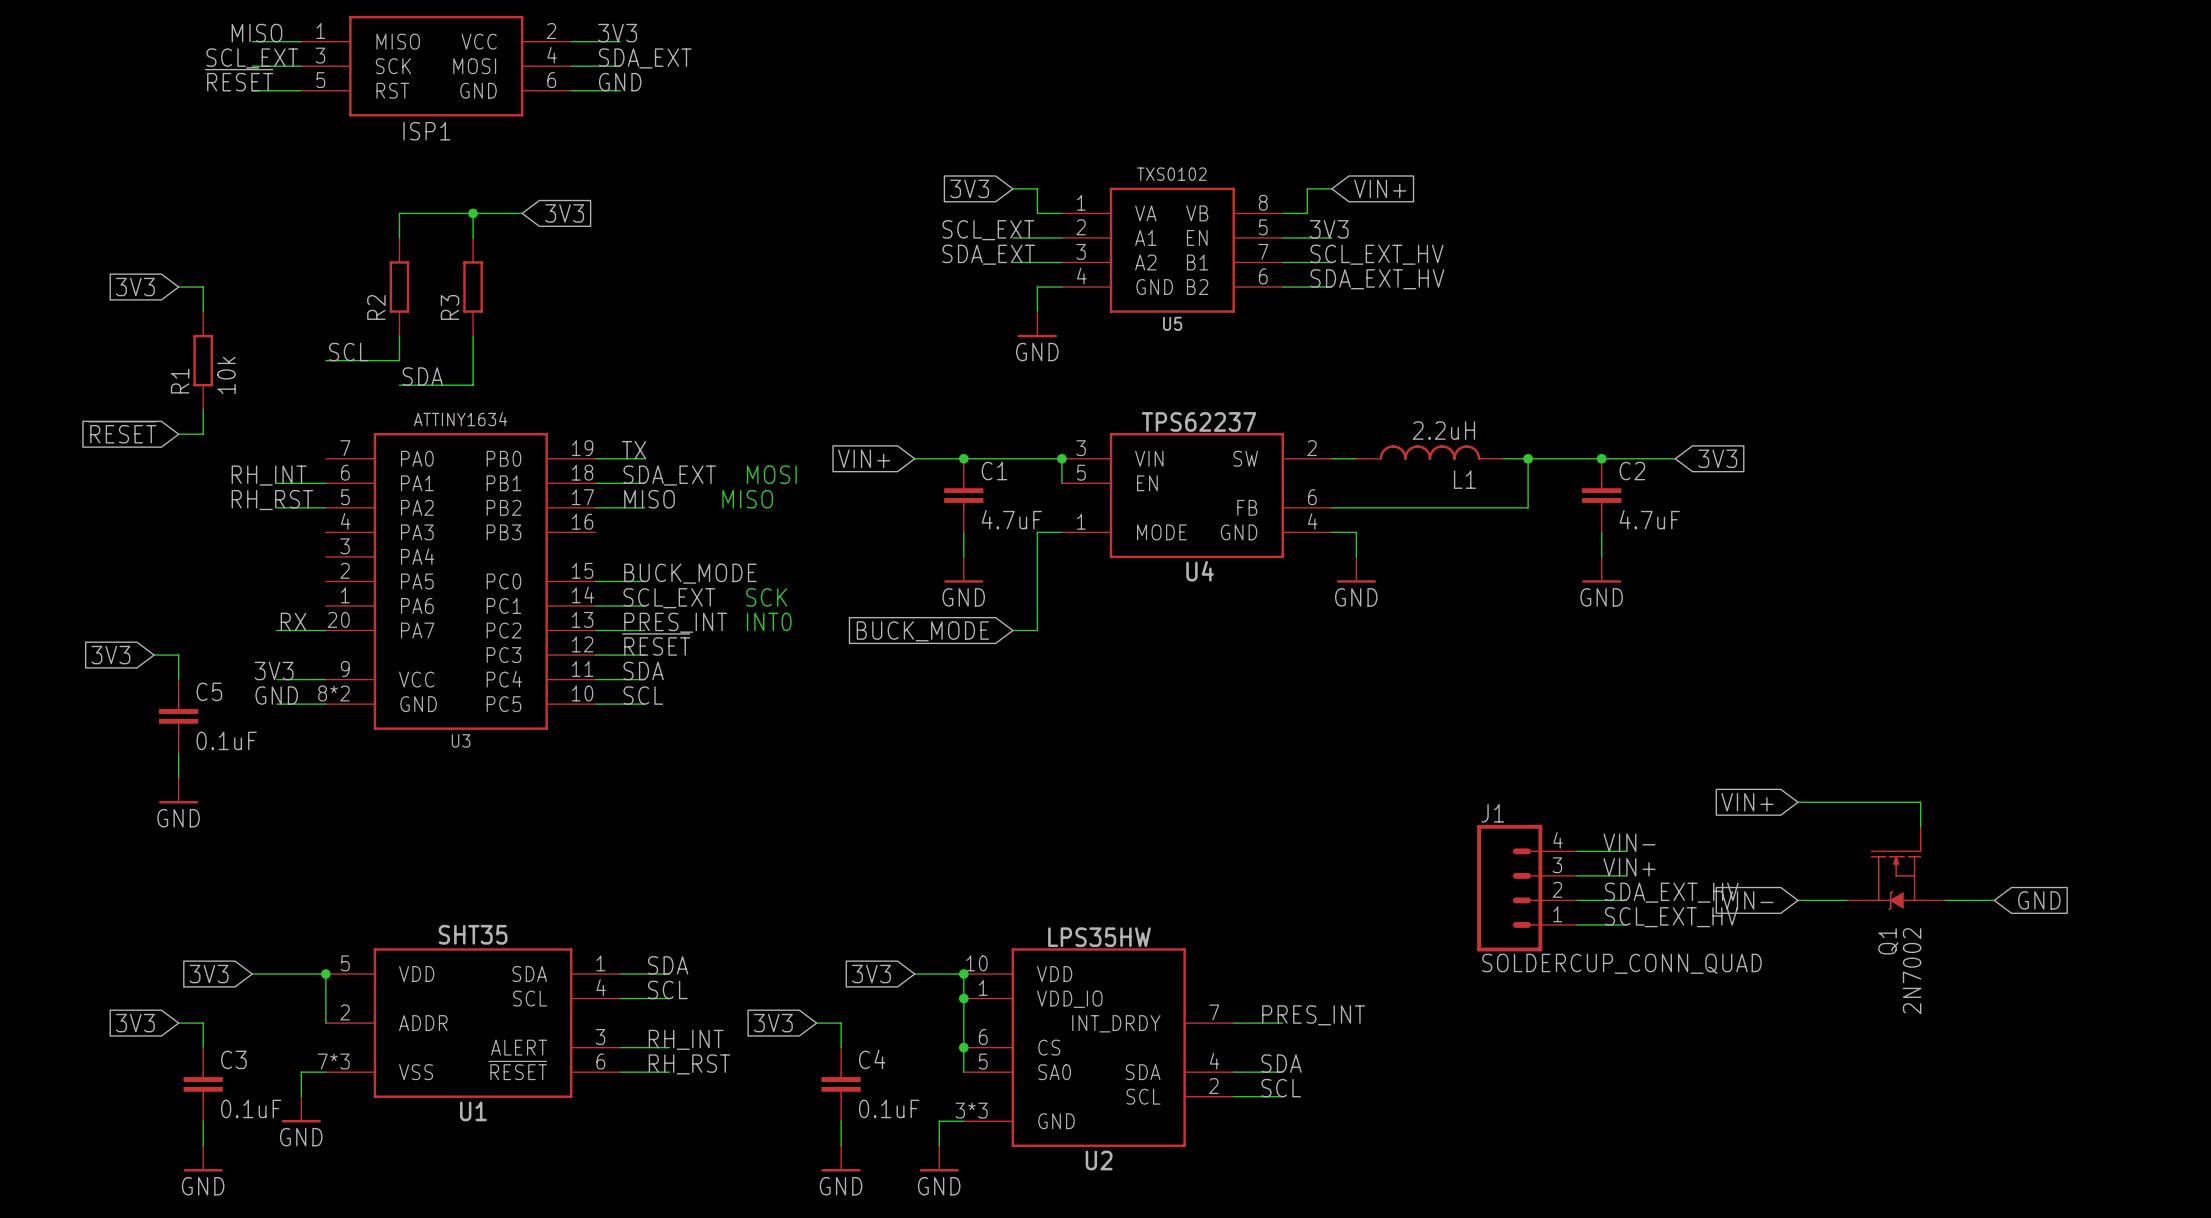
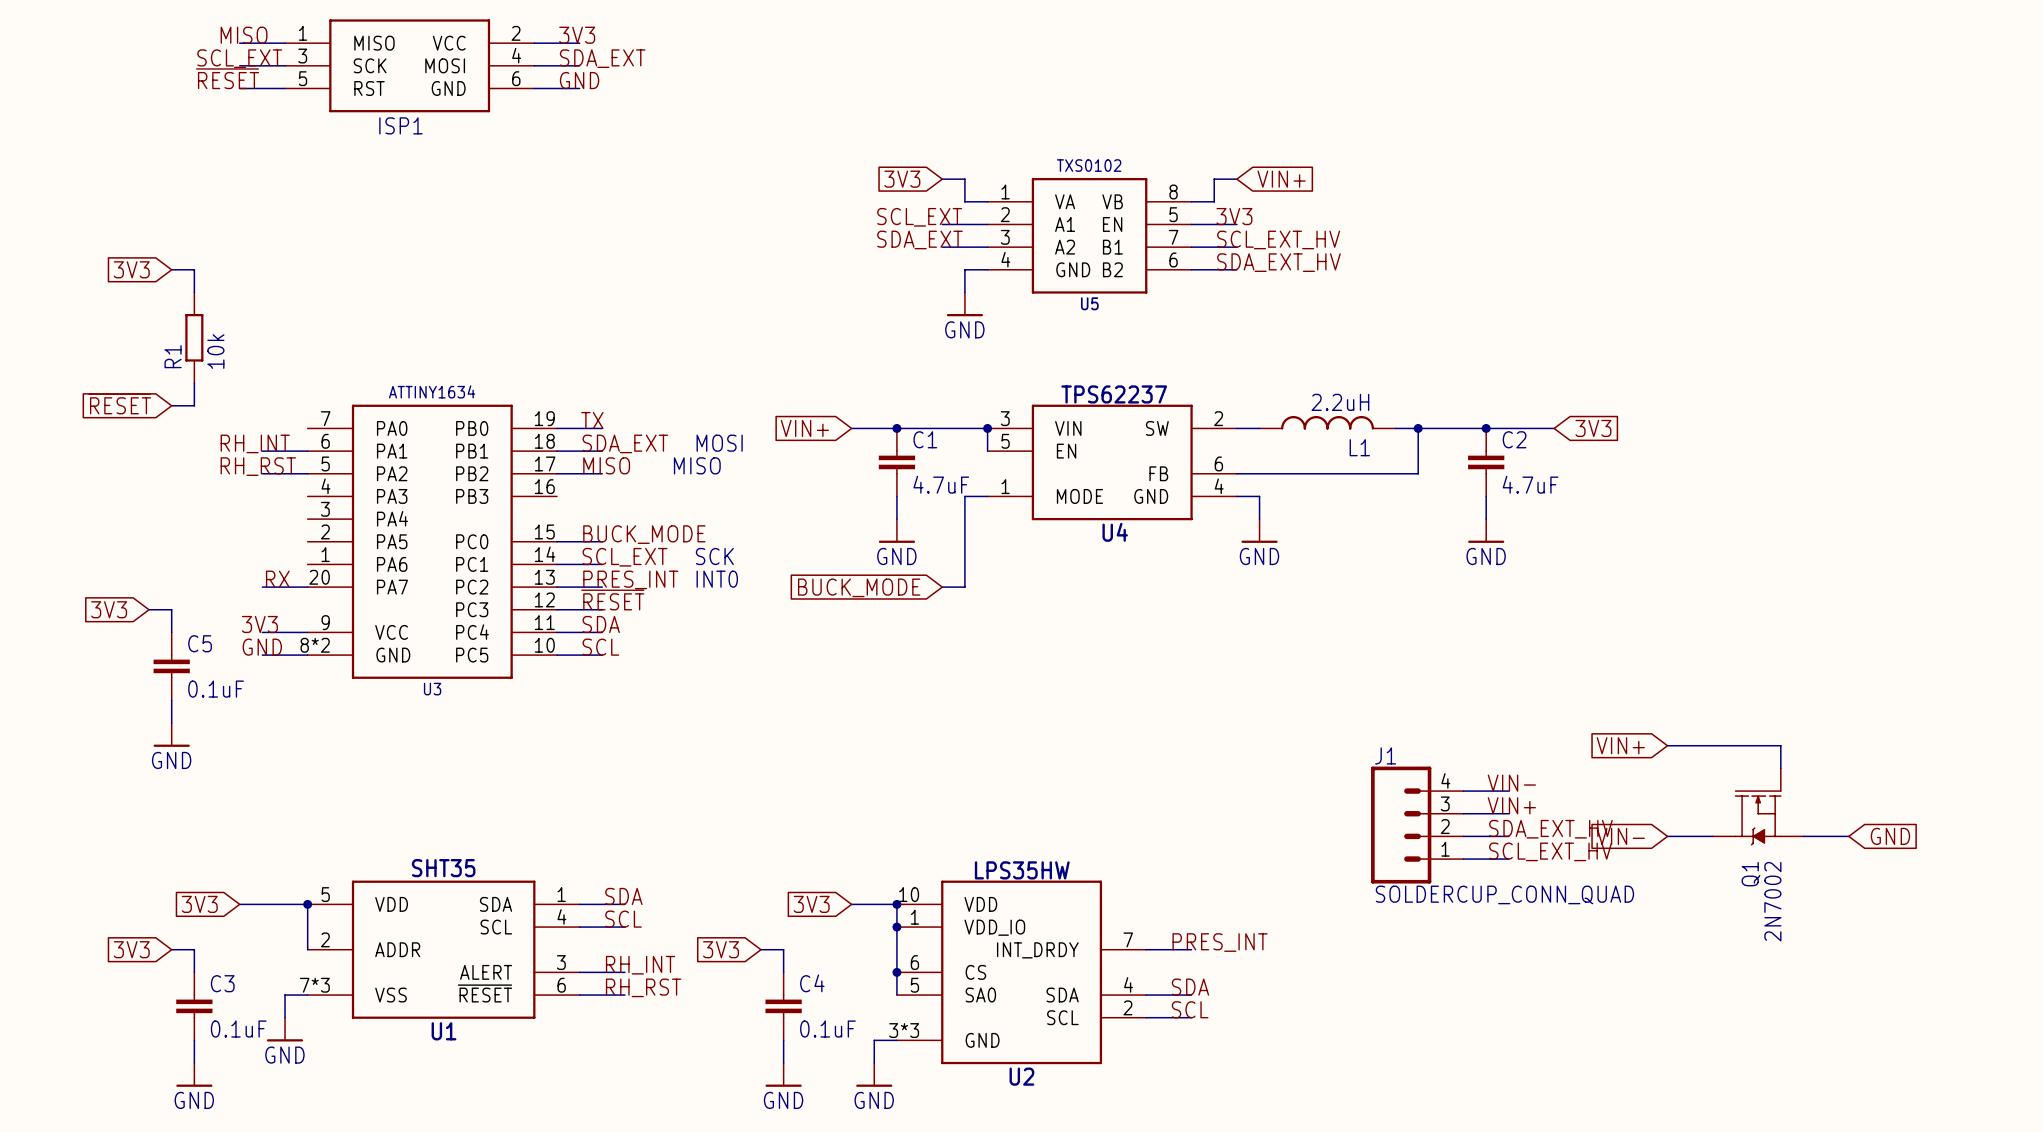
wire: (473, 213) (473, 237) -> none
junction: (473, 213) -> none
wire: (522, 213) (399, 213) (399, 237) -> none
global label: 3V3 (564, 213) -> none
R2: (399, 287) -> none
R3: (473, 287) -> none
wire: (399, 336) (399, 360) (325, 360) -> none
wire: (473, 336) (473, 385) (399, 385) -> none
label: SCL (348, 352) -> none
label: SDA (422, 376) -> none

